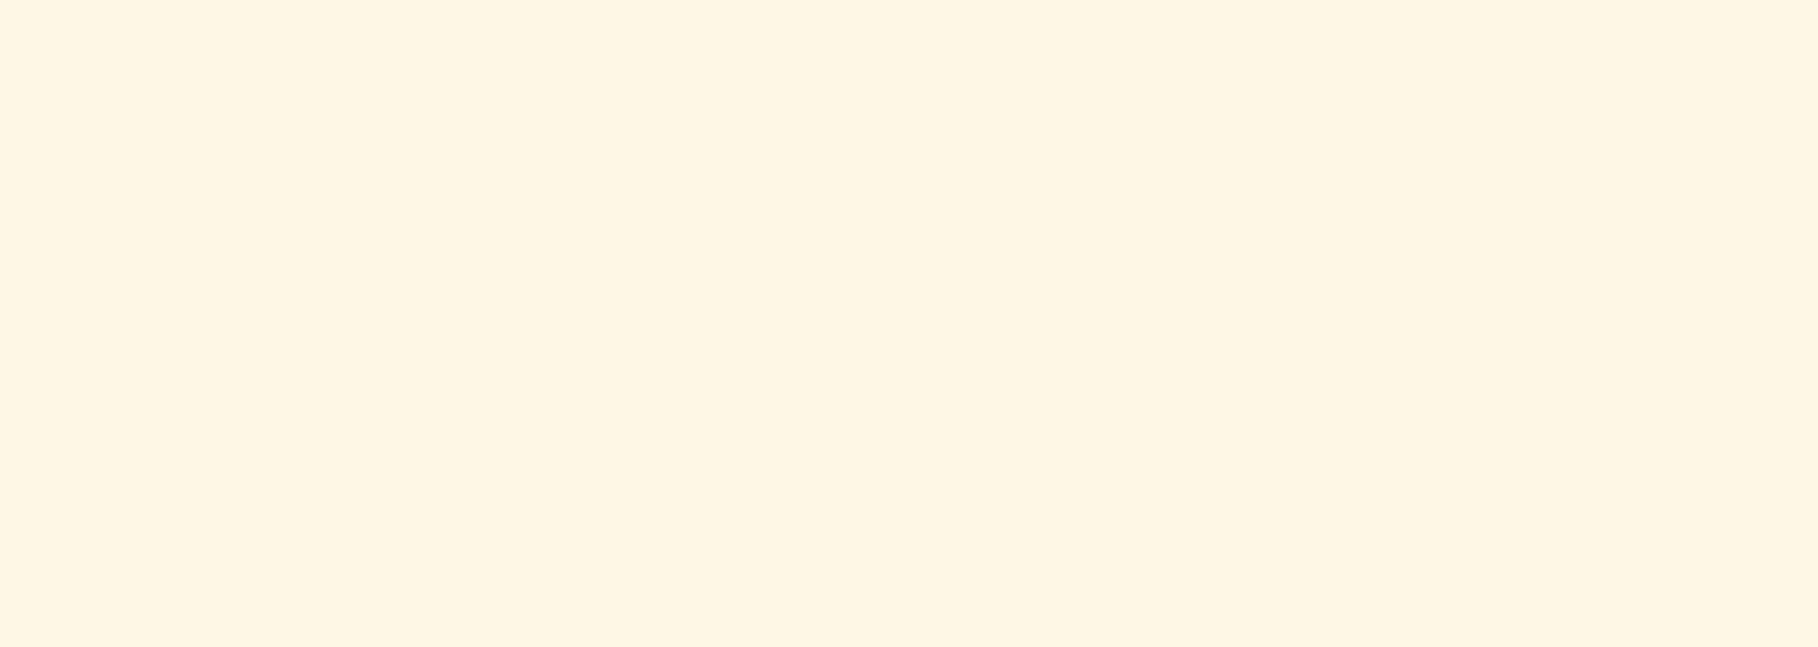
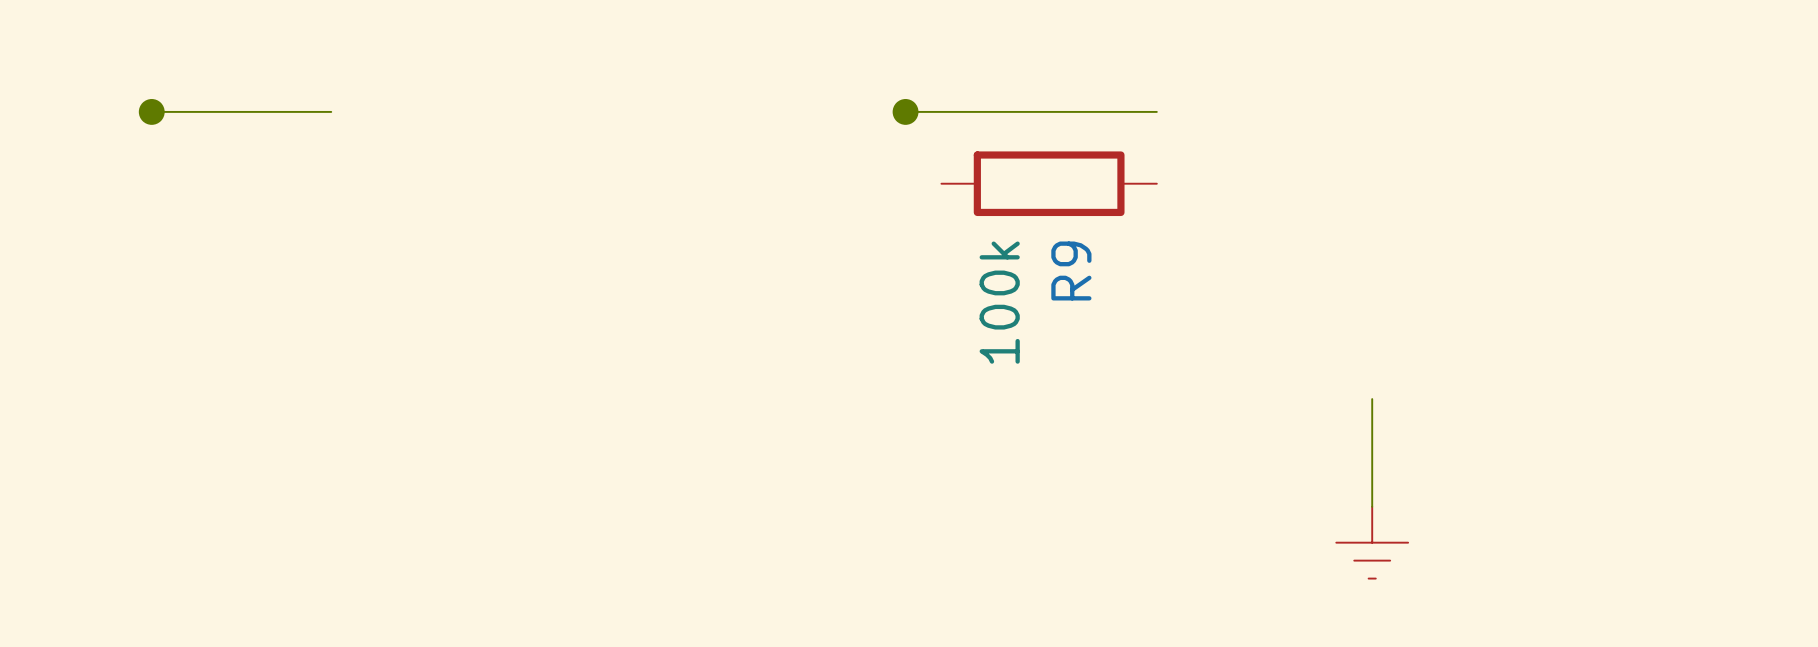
wire: none -> (151, 111) (331, 111)
junction: none -> (151, 111)
wire: none -> (905, 111) (1156, 111)
junction: none -> (905, 111)
R9: none -> 100k (1049, 183)
wire: none -> (1372, 399) (1372, 506)
power symbol: none -> (1372, 542)

